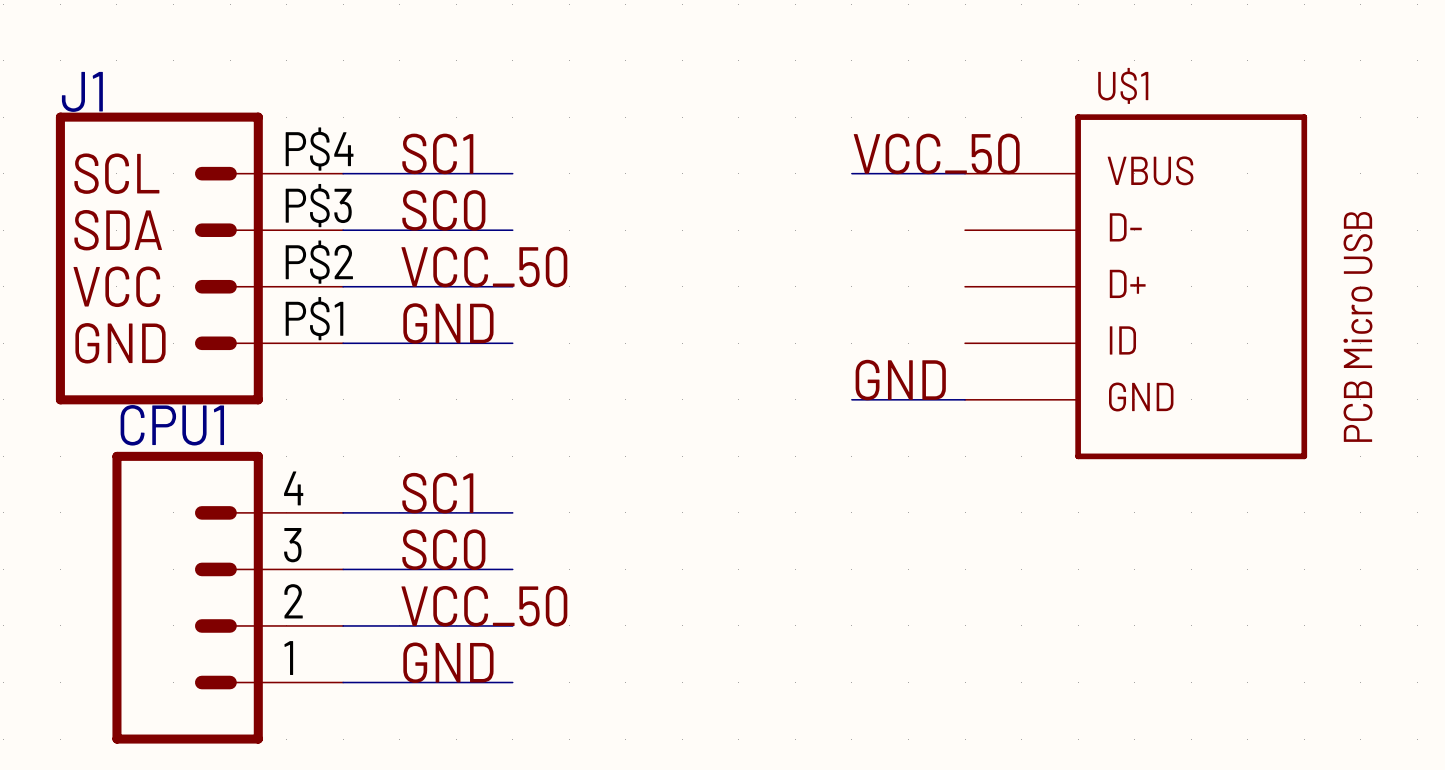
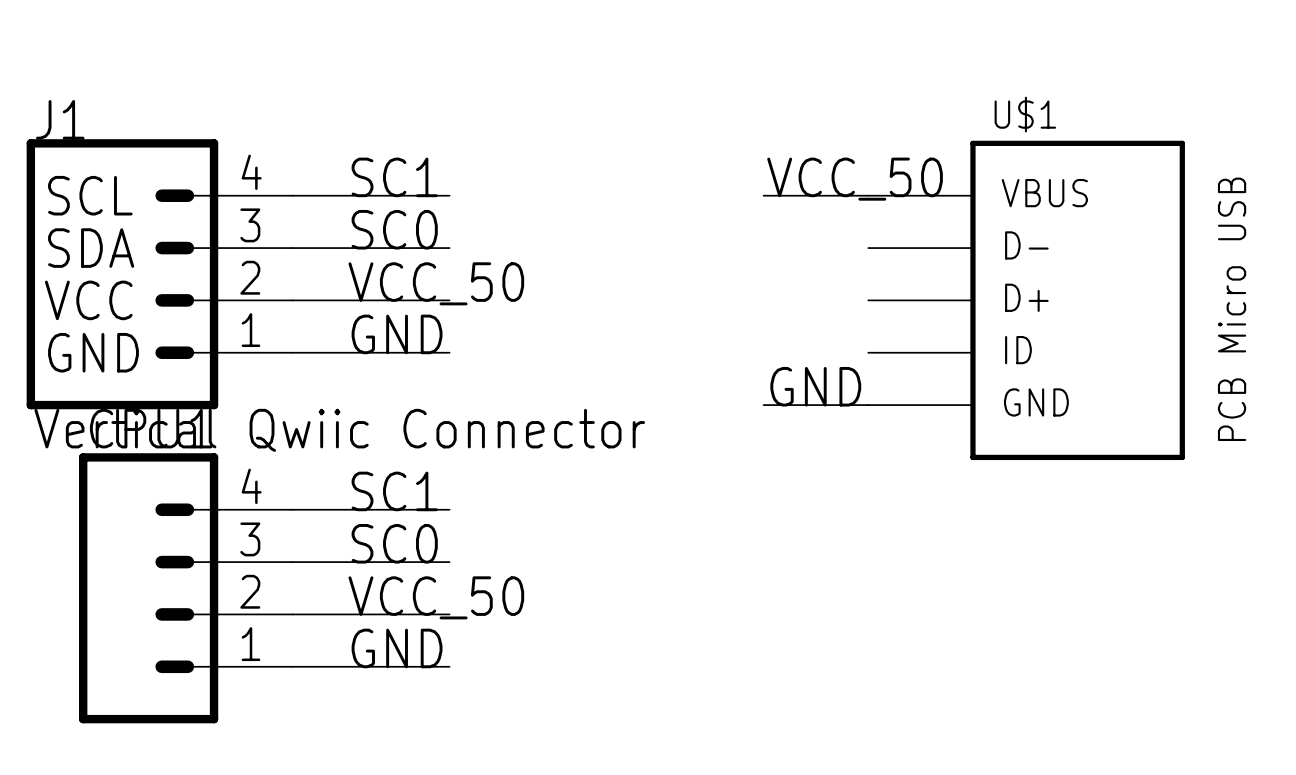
J1 pin number: P$4 (319, 149) -> 4 (251, 172)
J1 pin number: P$3 (318, 205) -> 3 (250, 225)
J1 pin number: P$2 (319, 262) -> 2 (250, 277)
J1 pin number: P$1 (314, 318) -> 1 (250, 330)
J1 value: none -> Vertical Qwiic Connector (339, 430)

